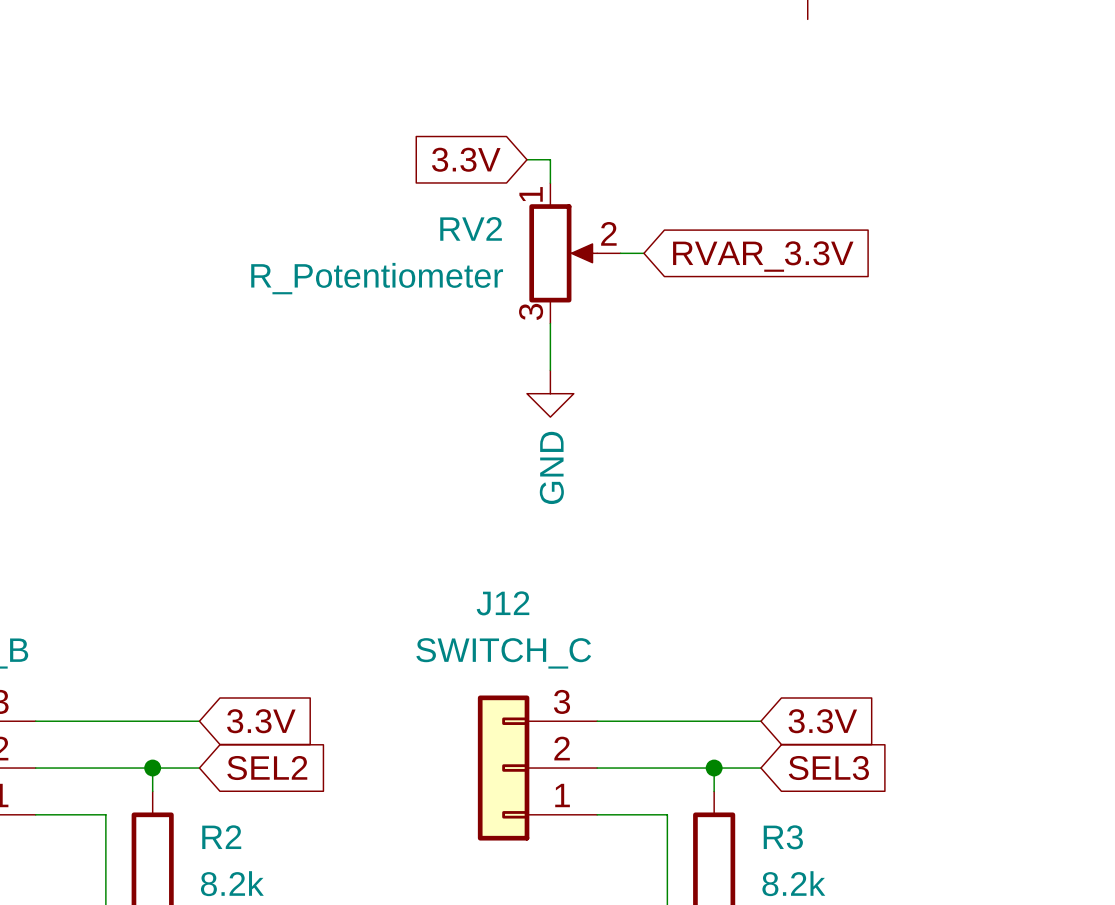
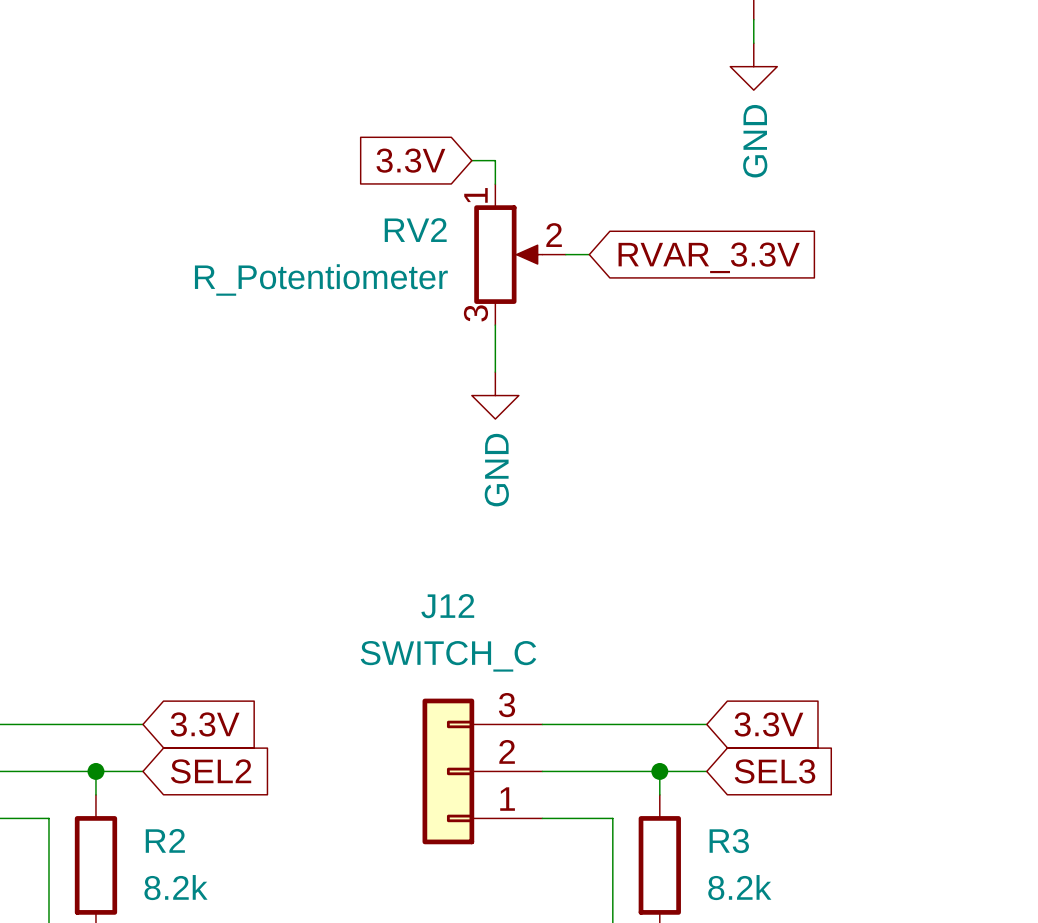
wire: none -> (753, 19) (753, 43)
power symbol: none -> GND (753, 66)

